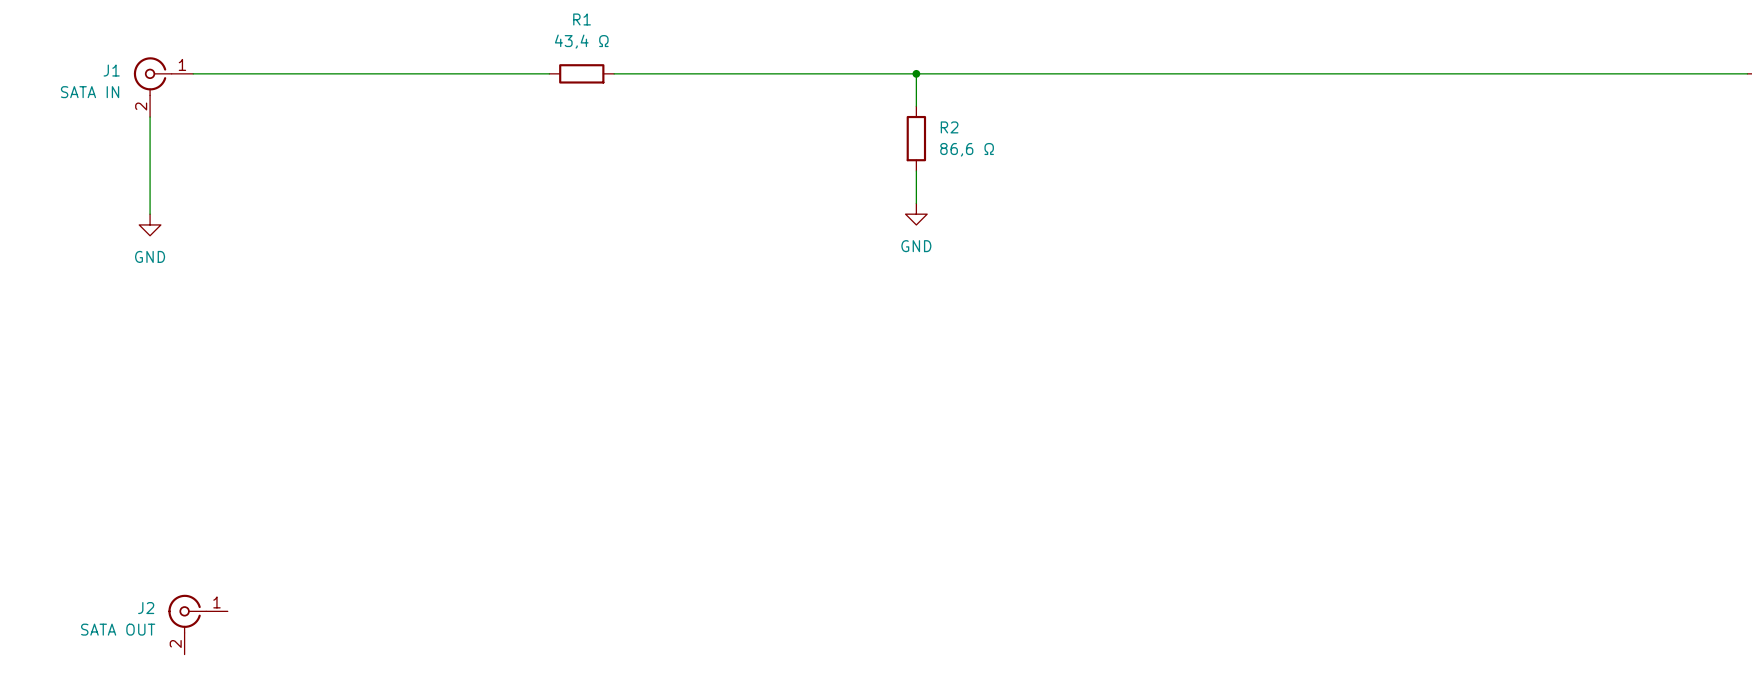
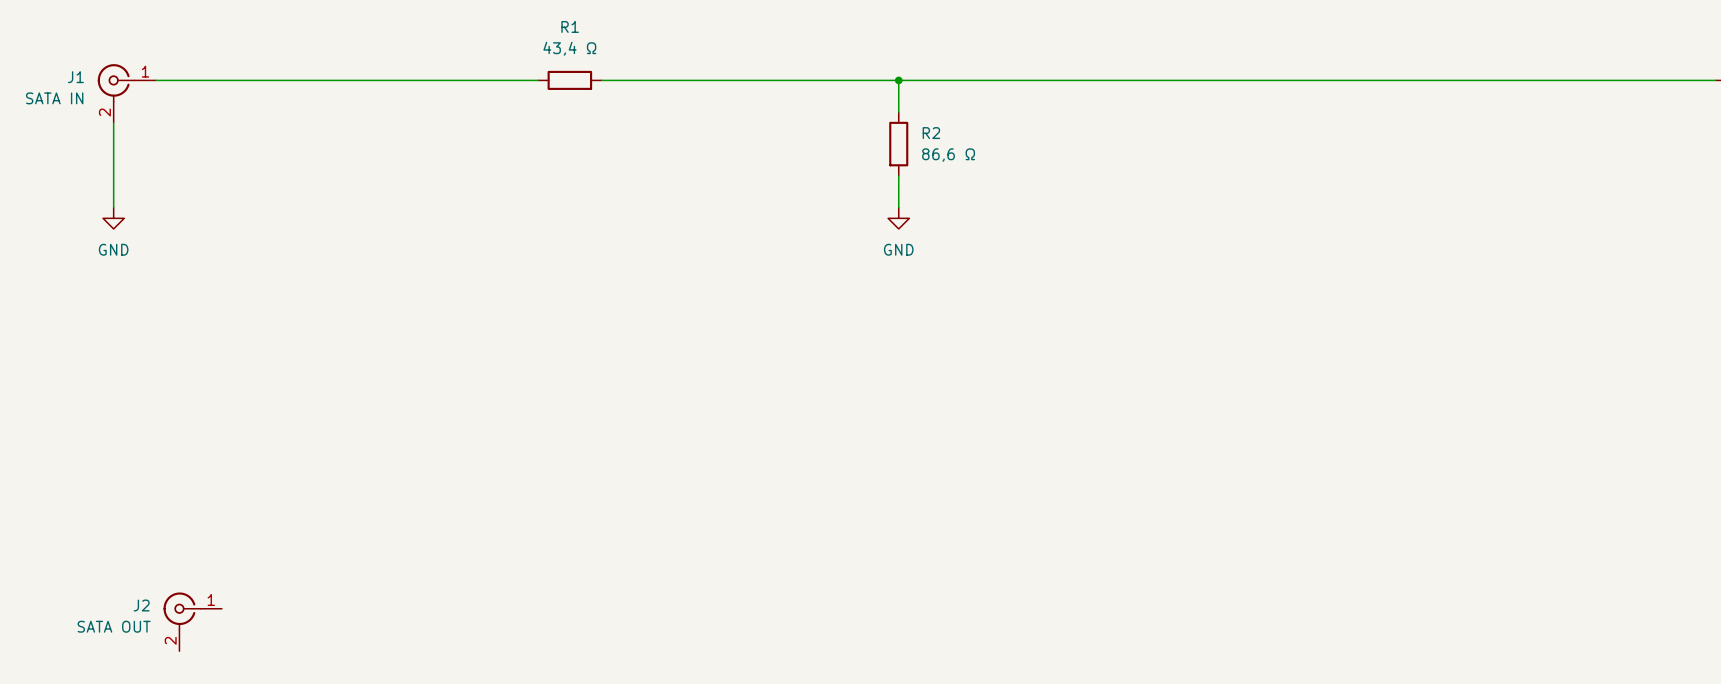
J1 position: (163, 87) -> (126, 93)
wire: none -> (113, 122) (113, 207)
wire: (150, 117) (150, 214) -> none
power symbol position: GND (150, 224) -> GND (113, 218)

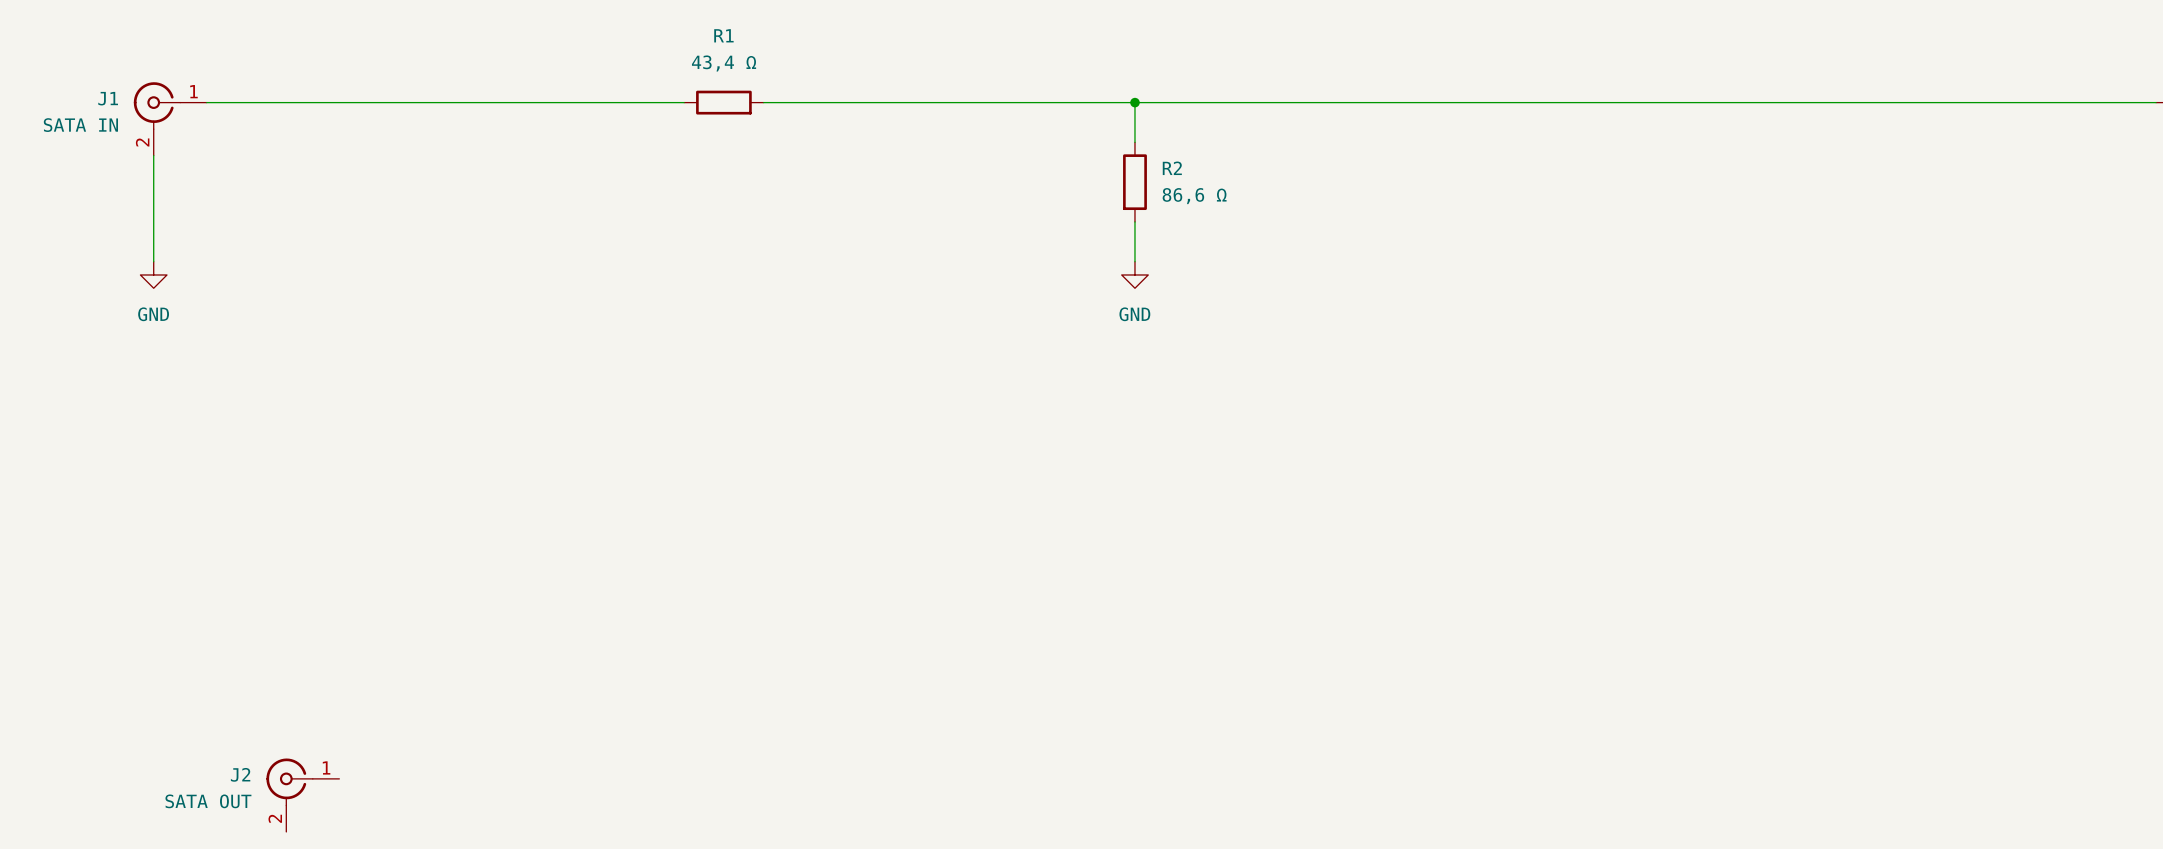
J2 position: (192, 621) -> (302, 795)

